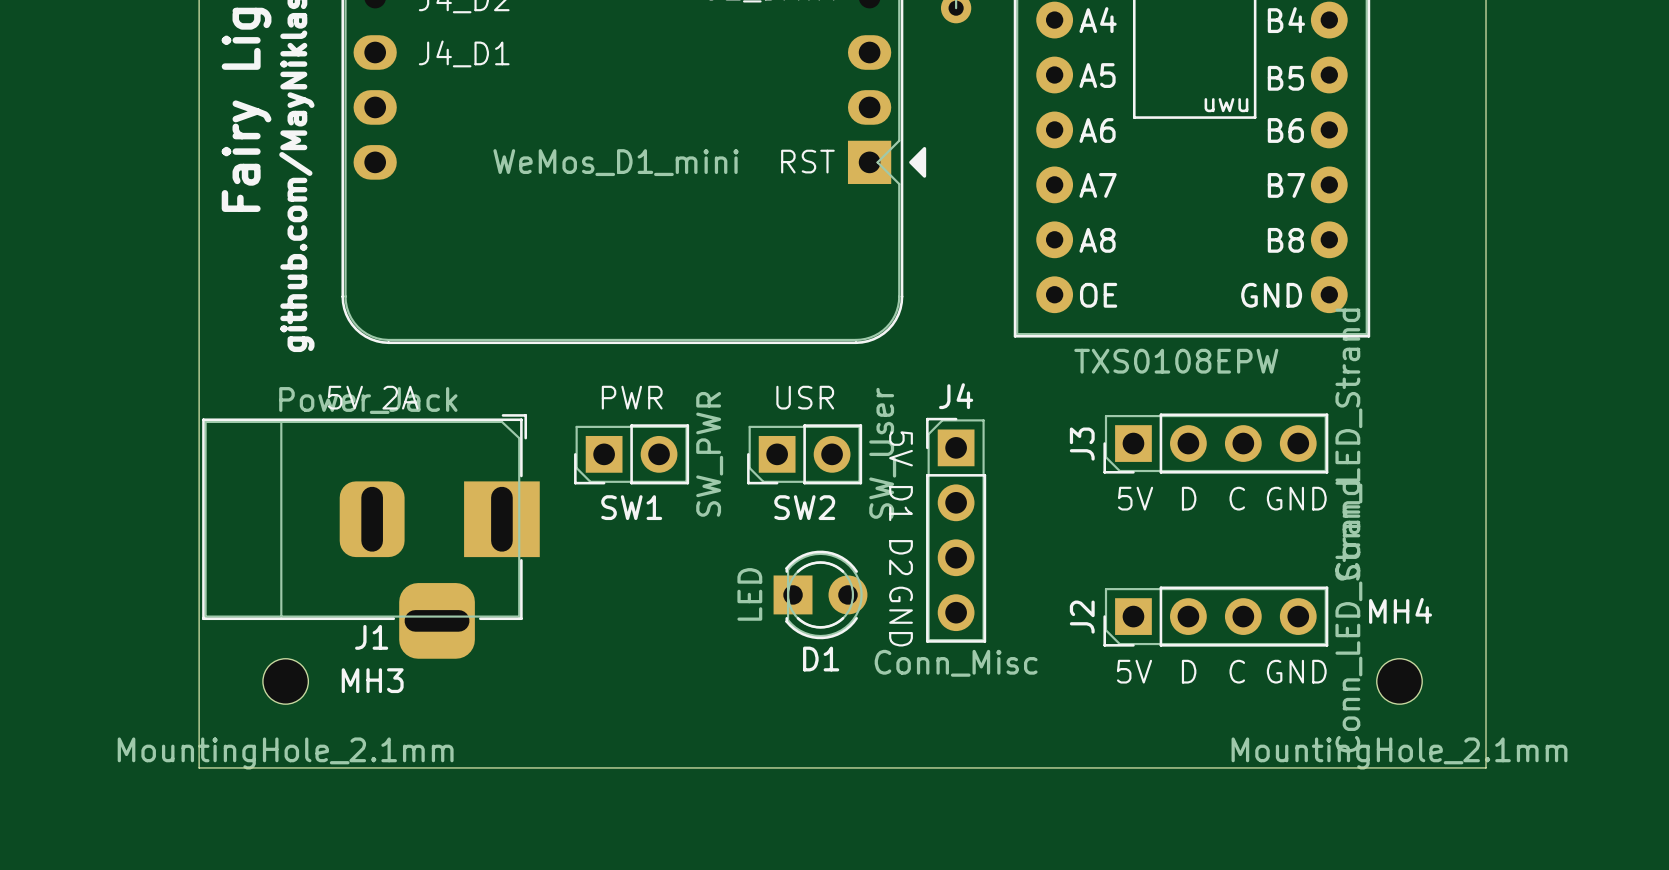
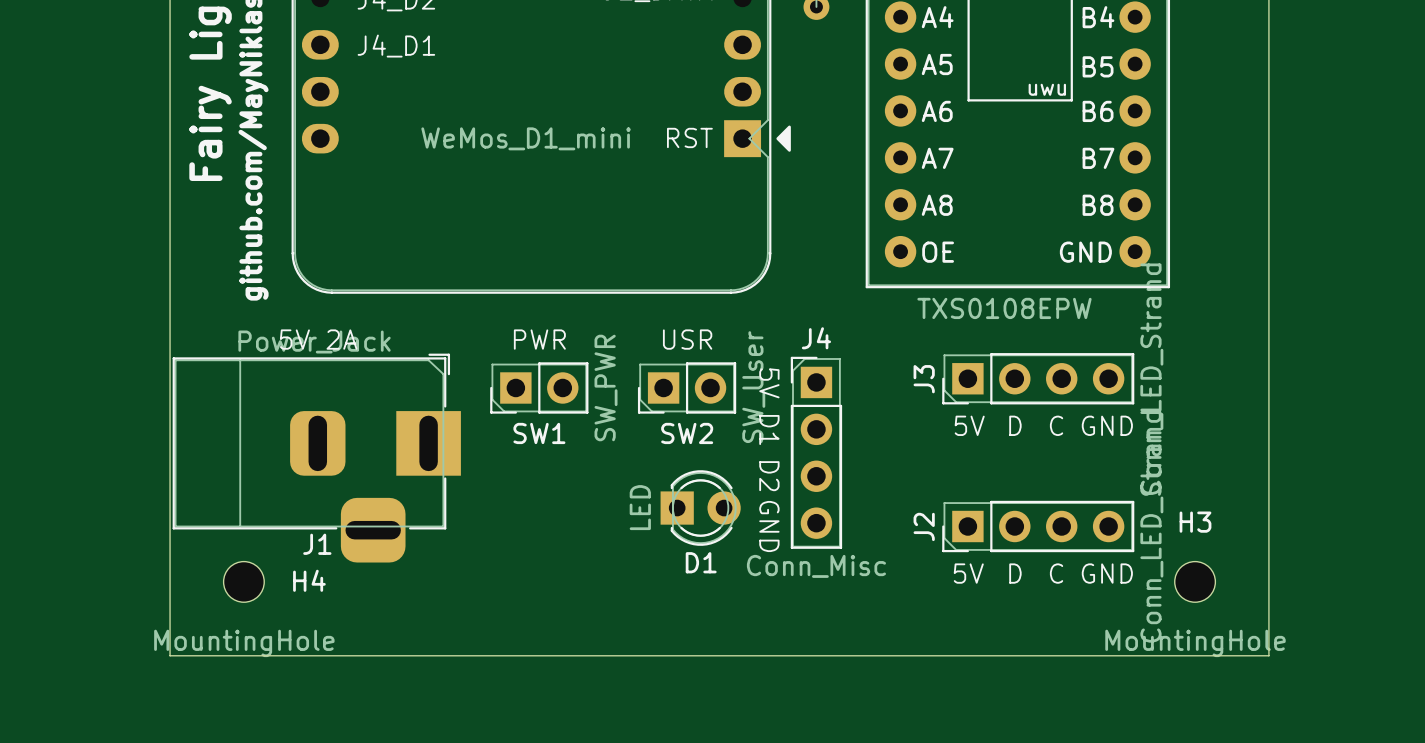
MH3: MountingHole_2.1mm (285, 681) -> none
H4: none -> MountingHole (243, 581)
MH4: MountingHole_2.1mm (1399, 681) -> none
H3: none -> MountingHole (1195, 581)

